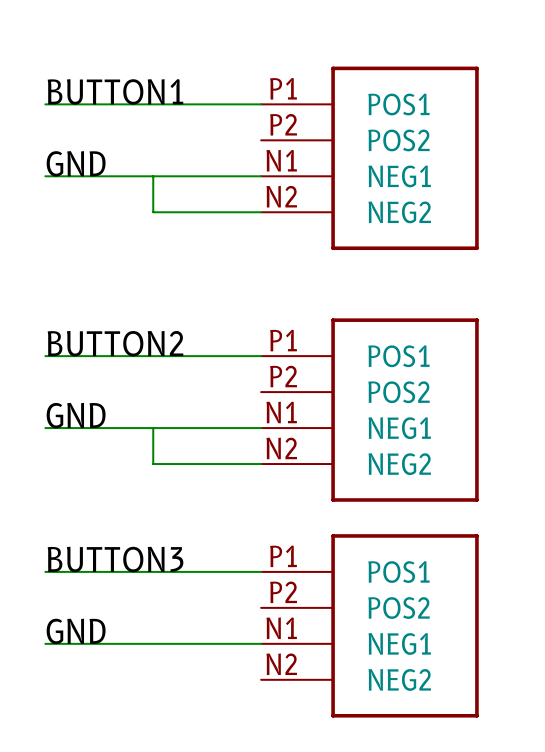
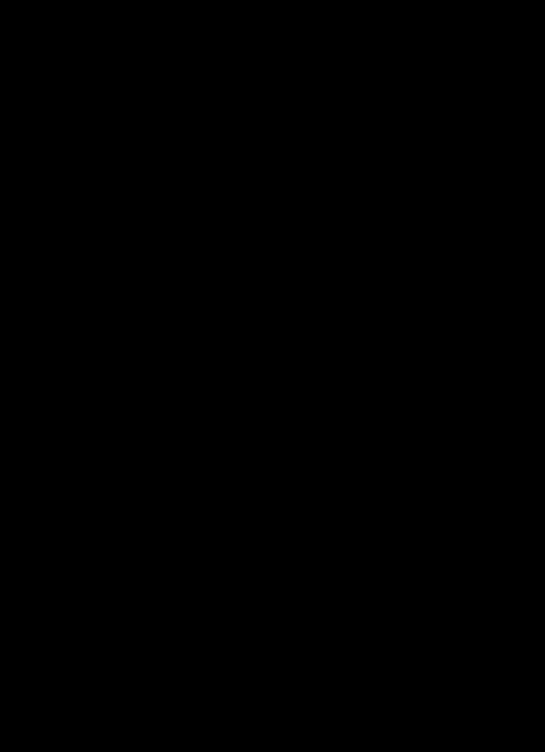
label: BUTTON1 (115, 91) -> none
wire: (45, 104) (261, 104) -> none
part: (369, 158) -> none
label: GND (76, 163) -> none
wire: (45, 176) (261, 176) -> none
wire: (153, 176) (153, 212) (261, 212) -> none
label: BUTTON2 (115, 343) -> none
wire: (45, 356) (261, 356) -> none
part: (369, 410) -> none
label: GND (76, 415) -> none
wire: (45, 428) (261, 428) -> none
wire: (153, 428) (153, 464) (261, 464) -> none
label: BUTTON3 (115, 559) -> none
wire: (45, 571) (261, 571) -> none
part: (369, 625) -> none
label: GND (76, 631) -> none
wire: (45, 643) (261, 643) -> none

